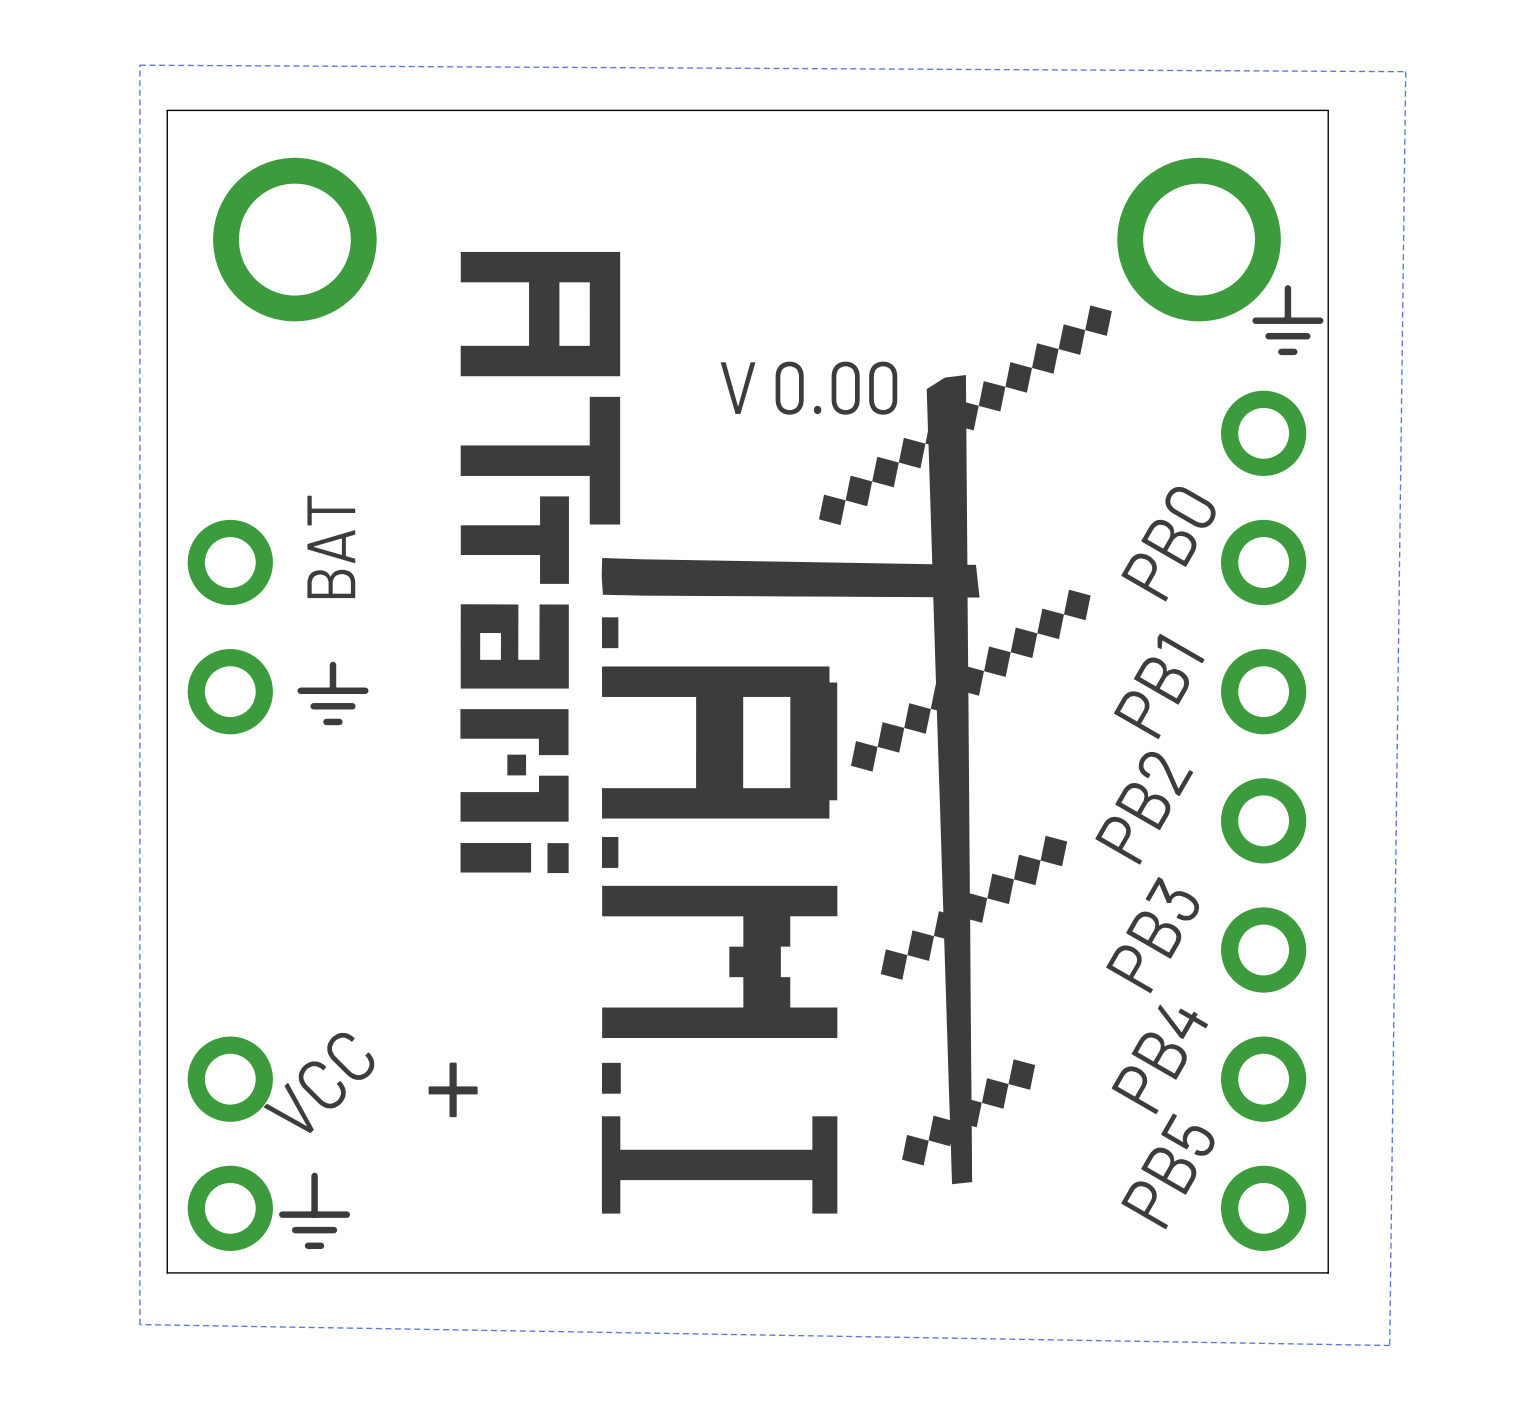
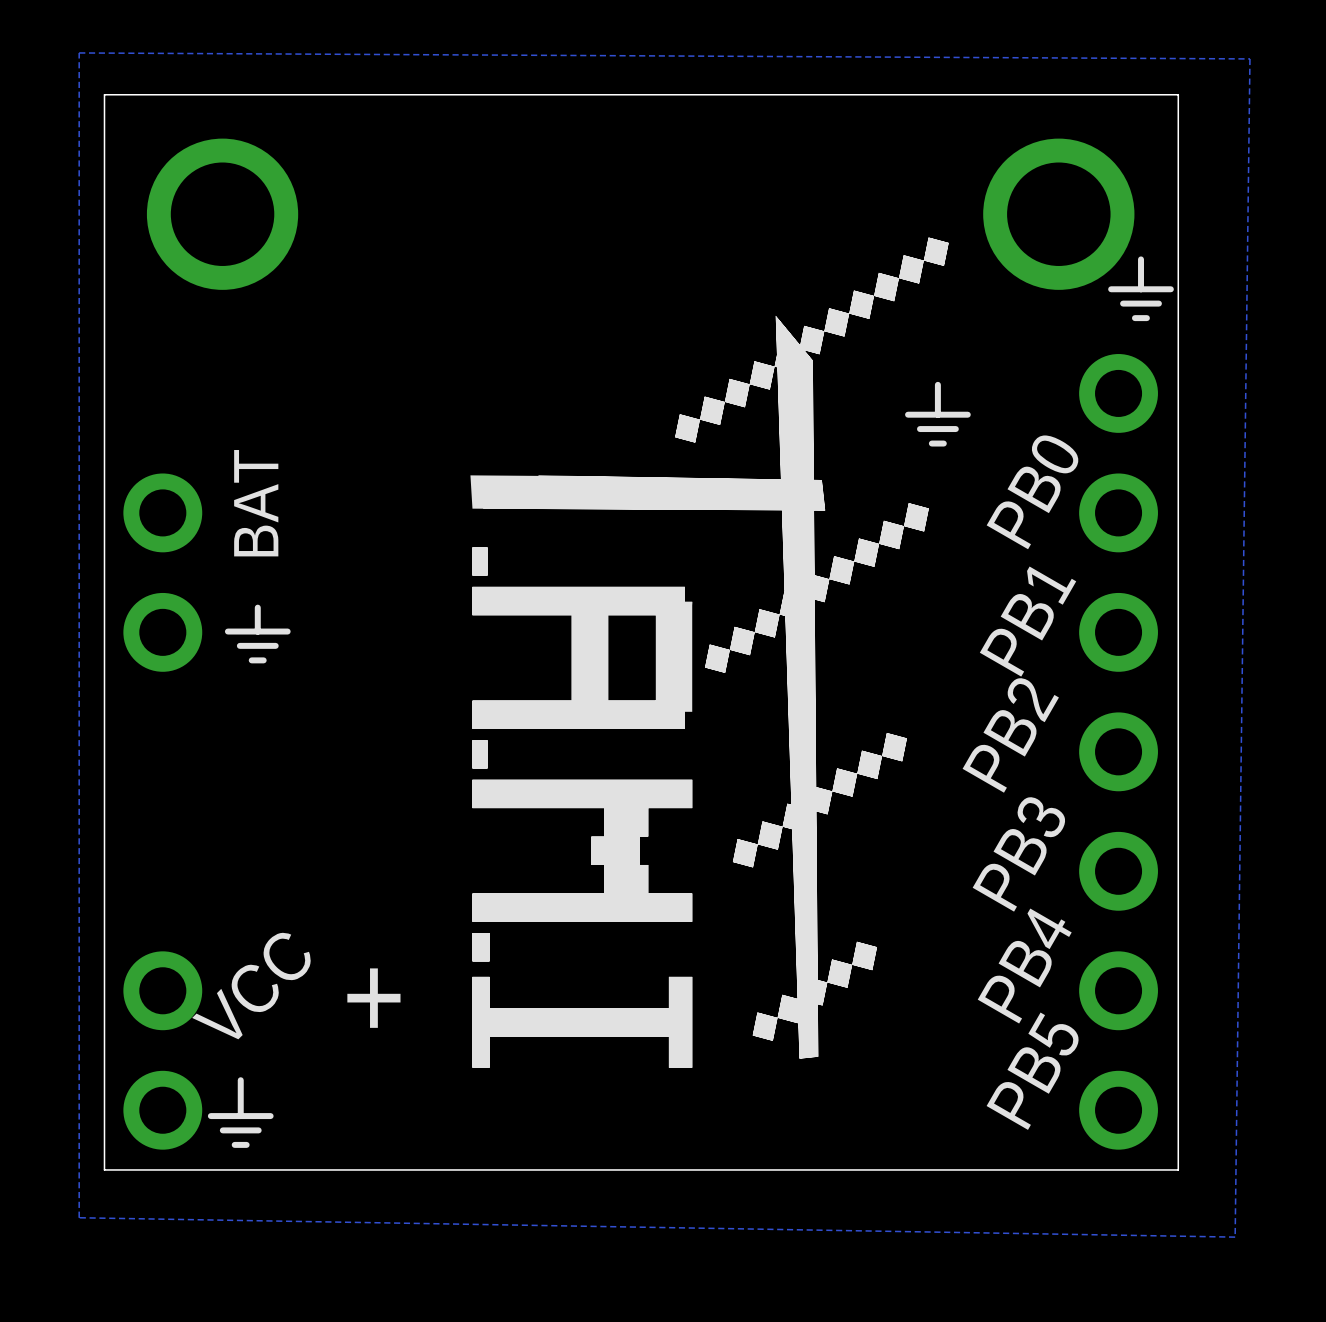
drawing: [460, 251, 1112, 1214] -> none
drawing: none -> [470, 237, 949, 1068]
text: V 0.00 (809, 388) -> none
line: none -> (937, 384) (937, 414)
line: none -> (967, 414) (908, 414)
line: none -> (955, 429) (919, 429)
line: none -> (943, 443) (931, 443)
drawing position: (610, 632) -> (479, 561)
drawing position: (610, 852) -> (479, 754)
drawing position: (611, 1078) -> (481, 947)

